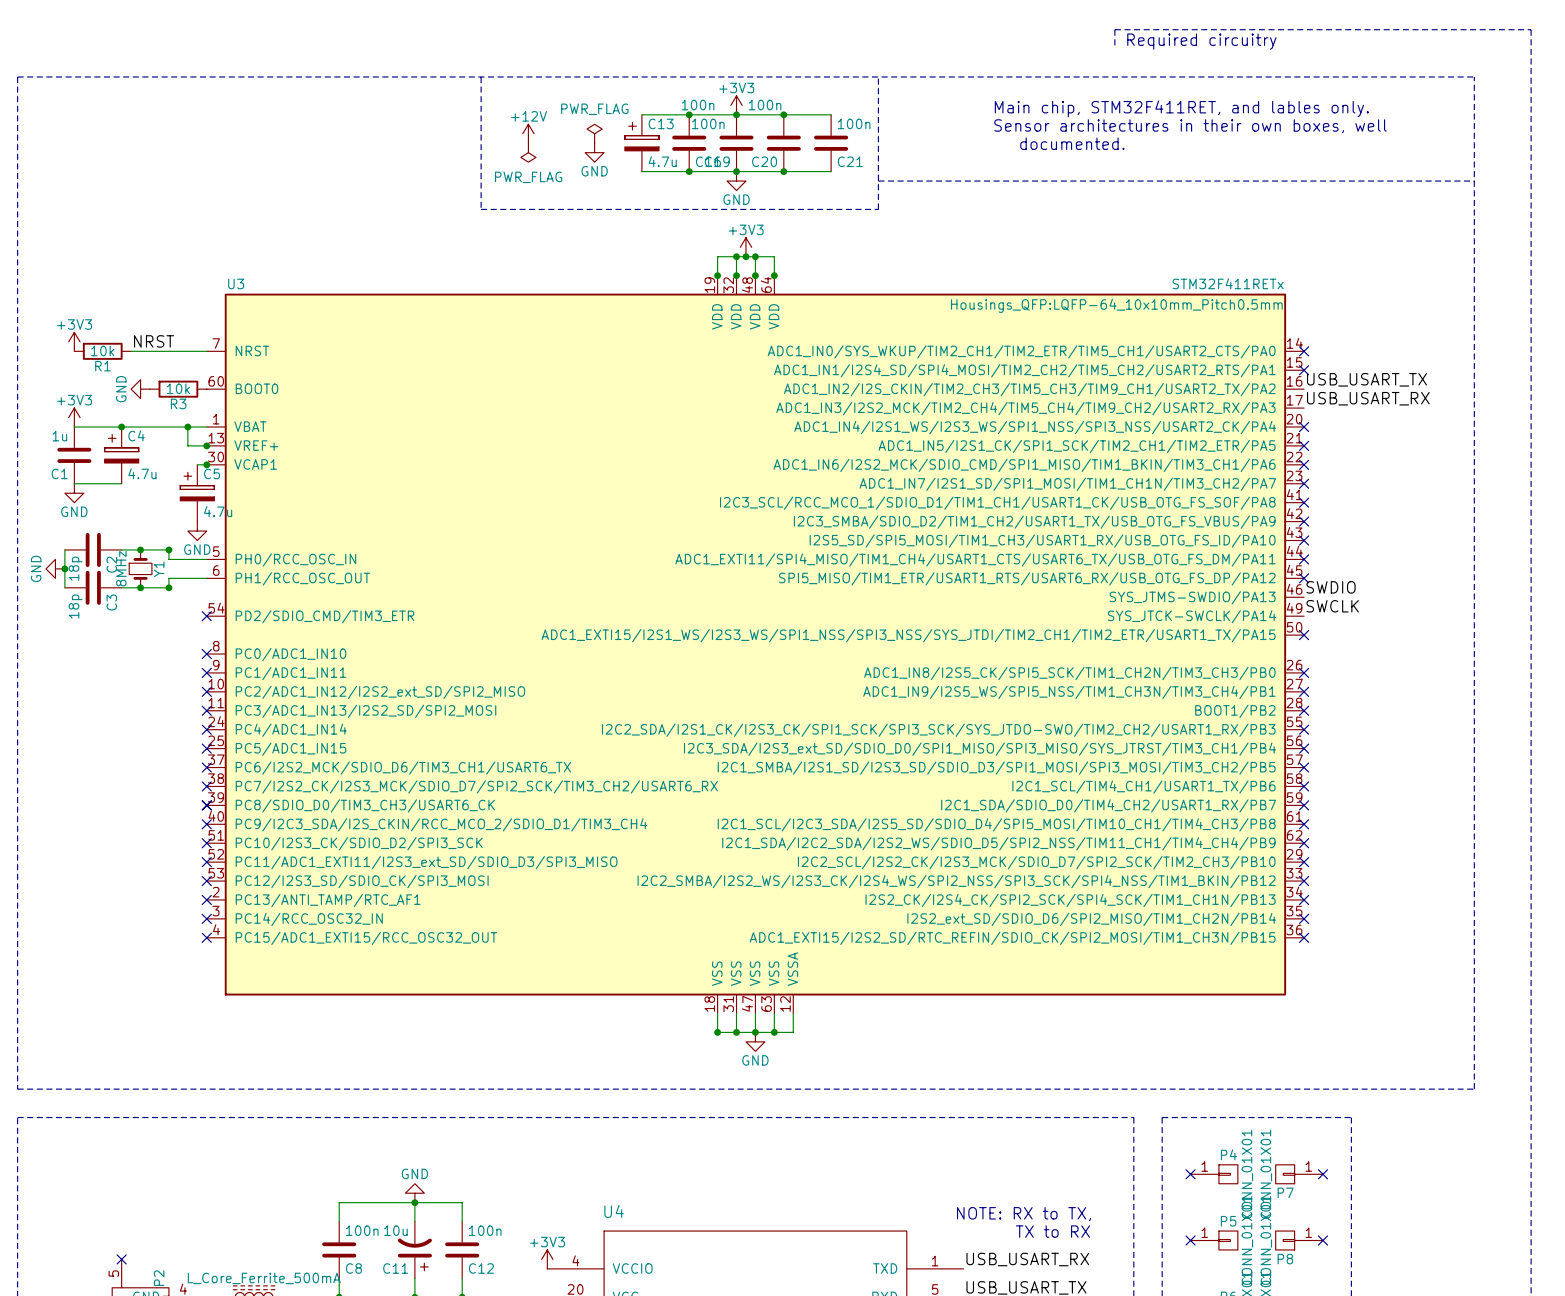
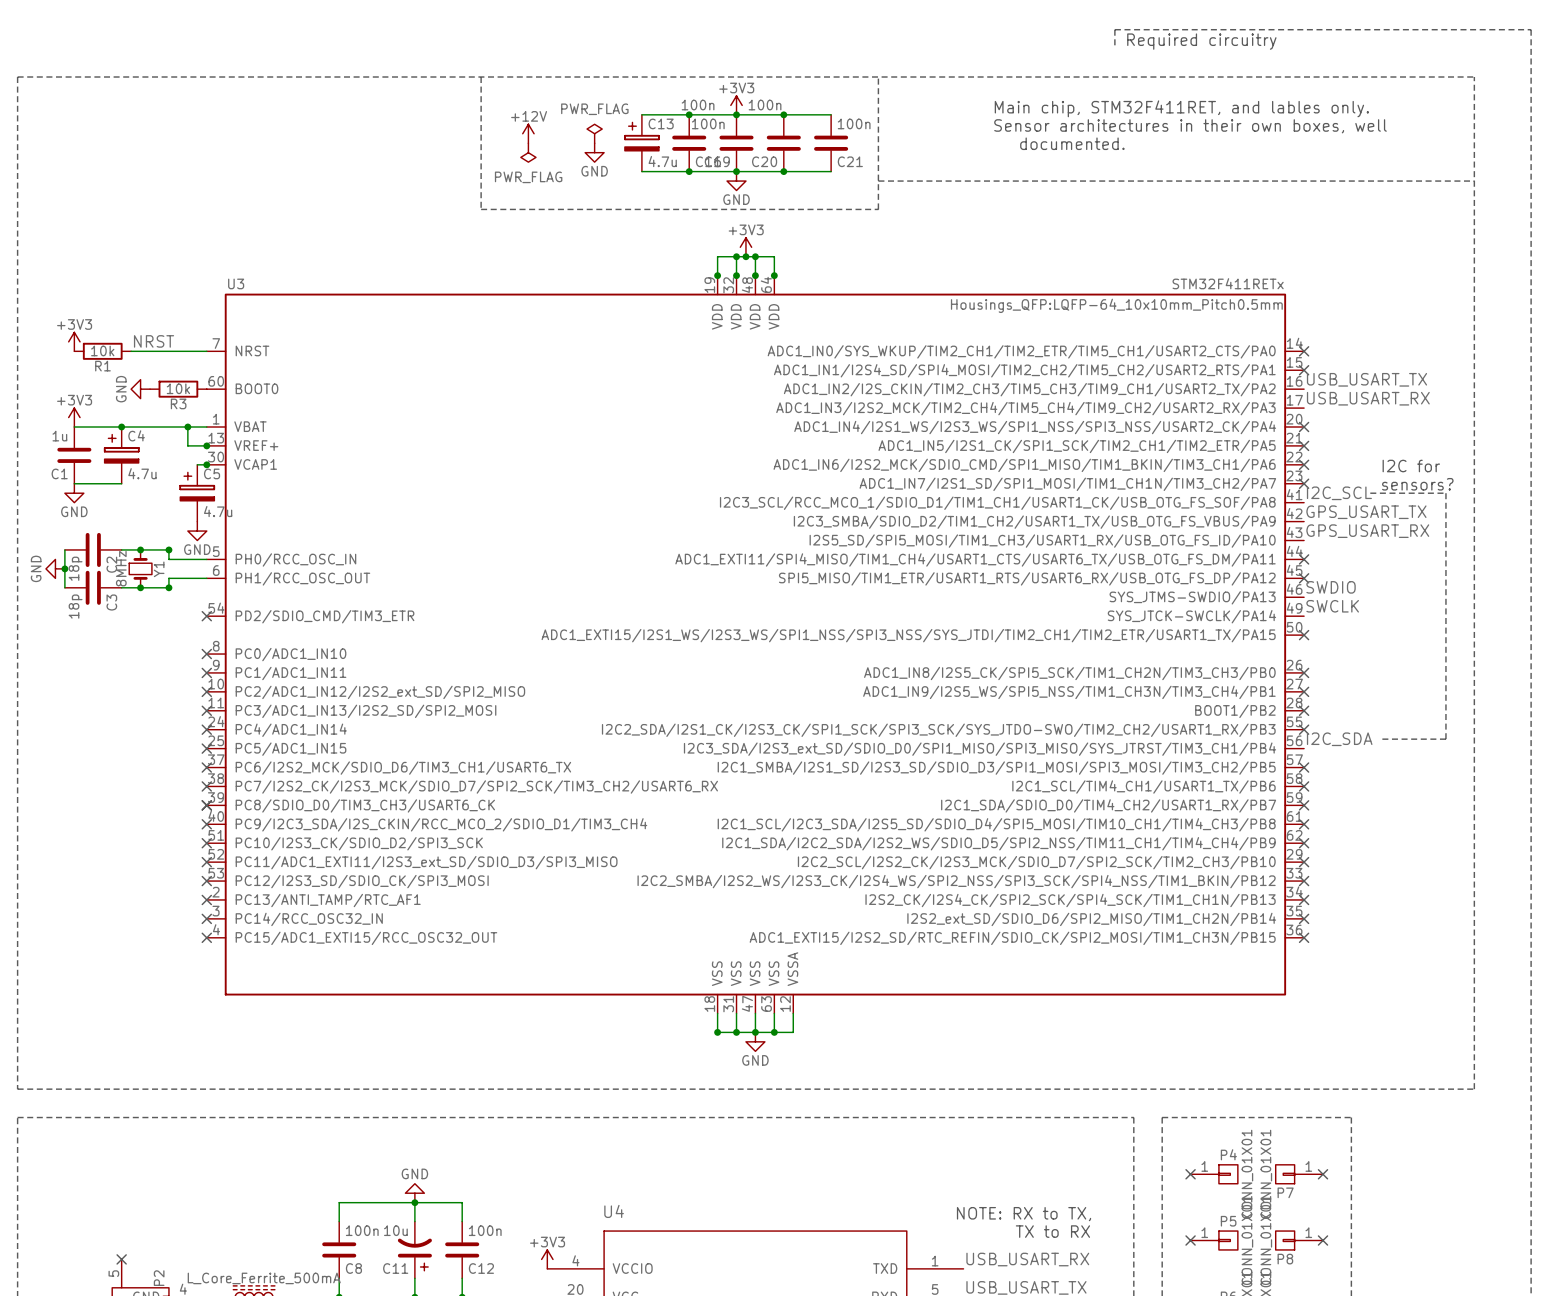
text: none -> I2C for (1411, 466)
text: none -> sensors? (1417, 484)
label: none -> I2C_SCL (1339, 493)
line: none -> (1370, 493) (1445, 493) (1445, 739) (1379, 739)
no-connect mark: (1304, 502) -> none
label: none -> GPS_USART_TX (1366, 512)
no-connect mark: (1304, 521) -> none
label: none -> GPS_USART_RX (1367, 531)
no-connect mark: (1304, 540) -> none
label: none -> I2C_SDA (1339, 739)
no-connect mark: (1304, 748) -> none

